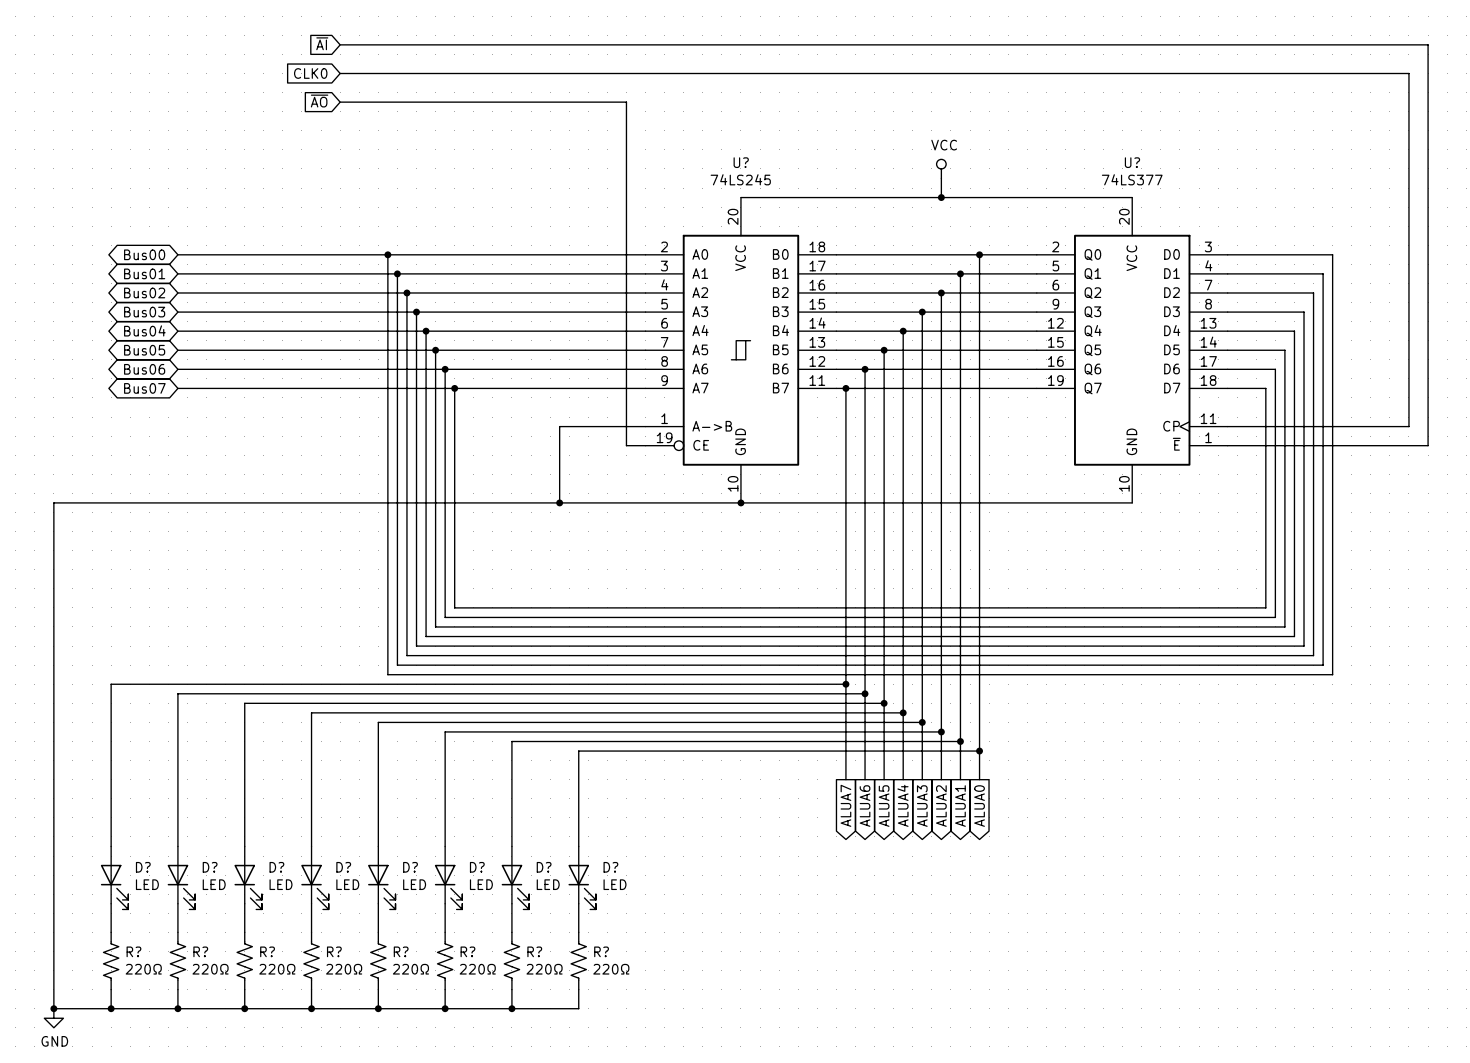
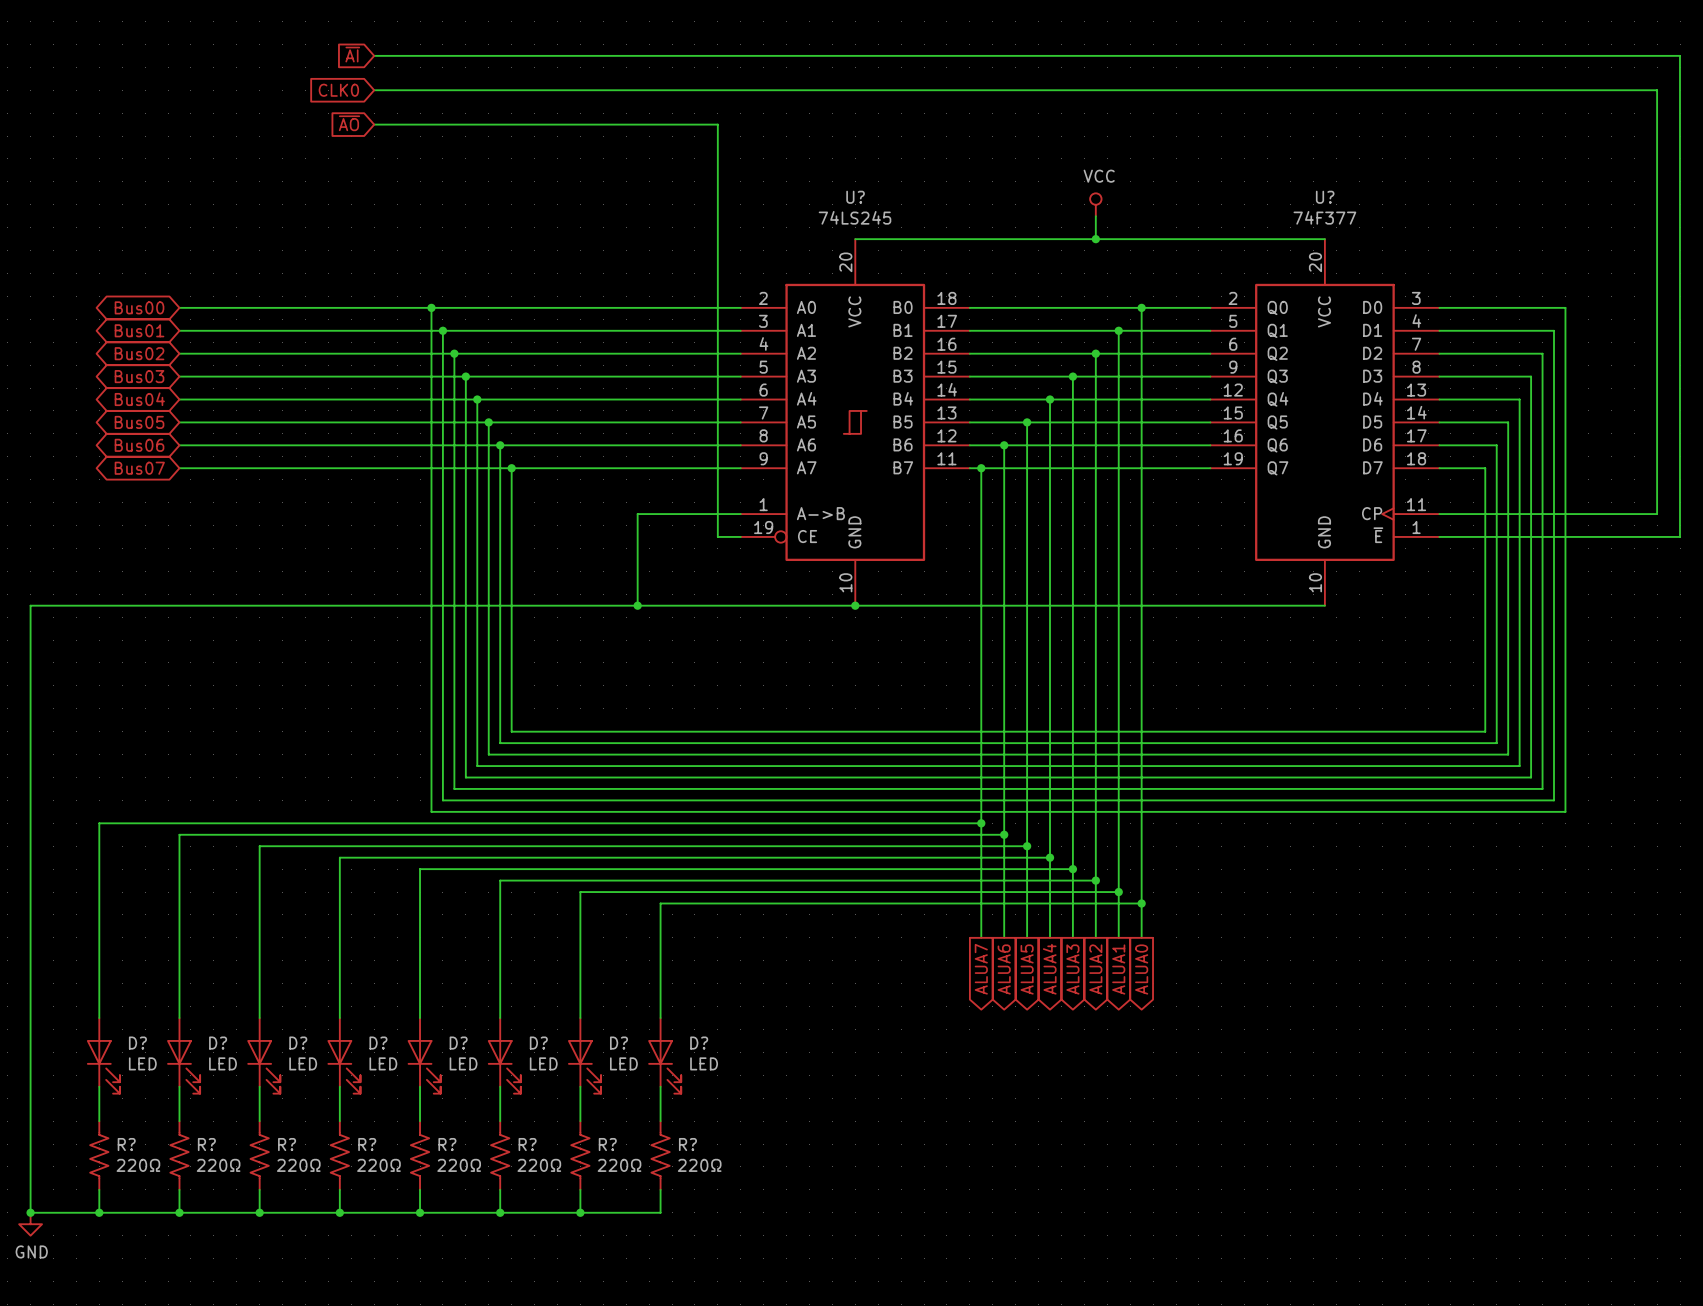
U? value: 74LS377 (1132, 179) -> 74F377 (1324, 217)

